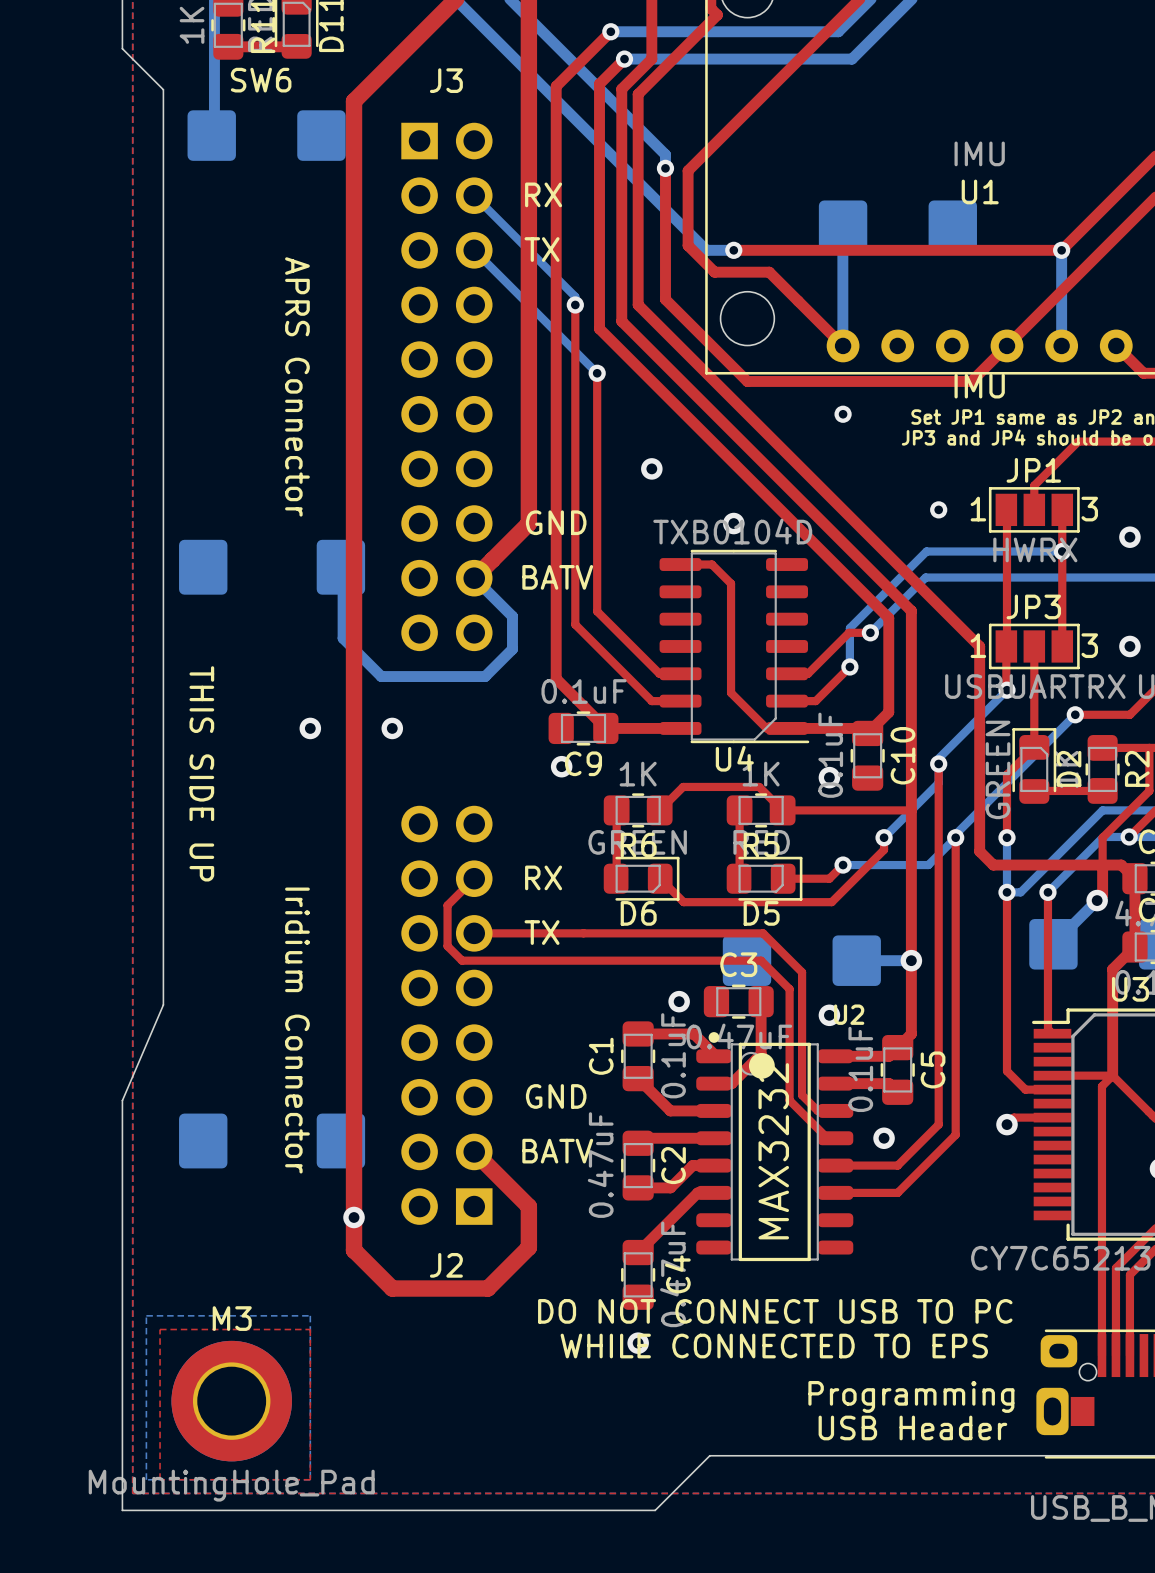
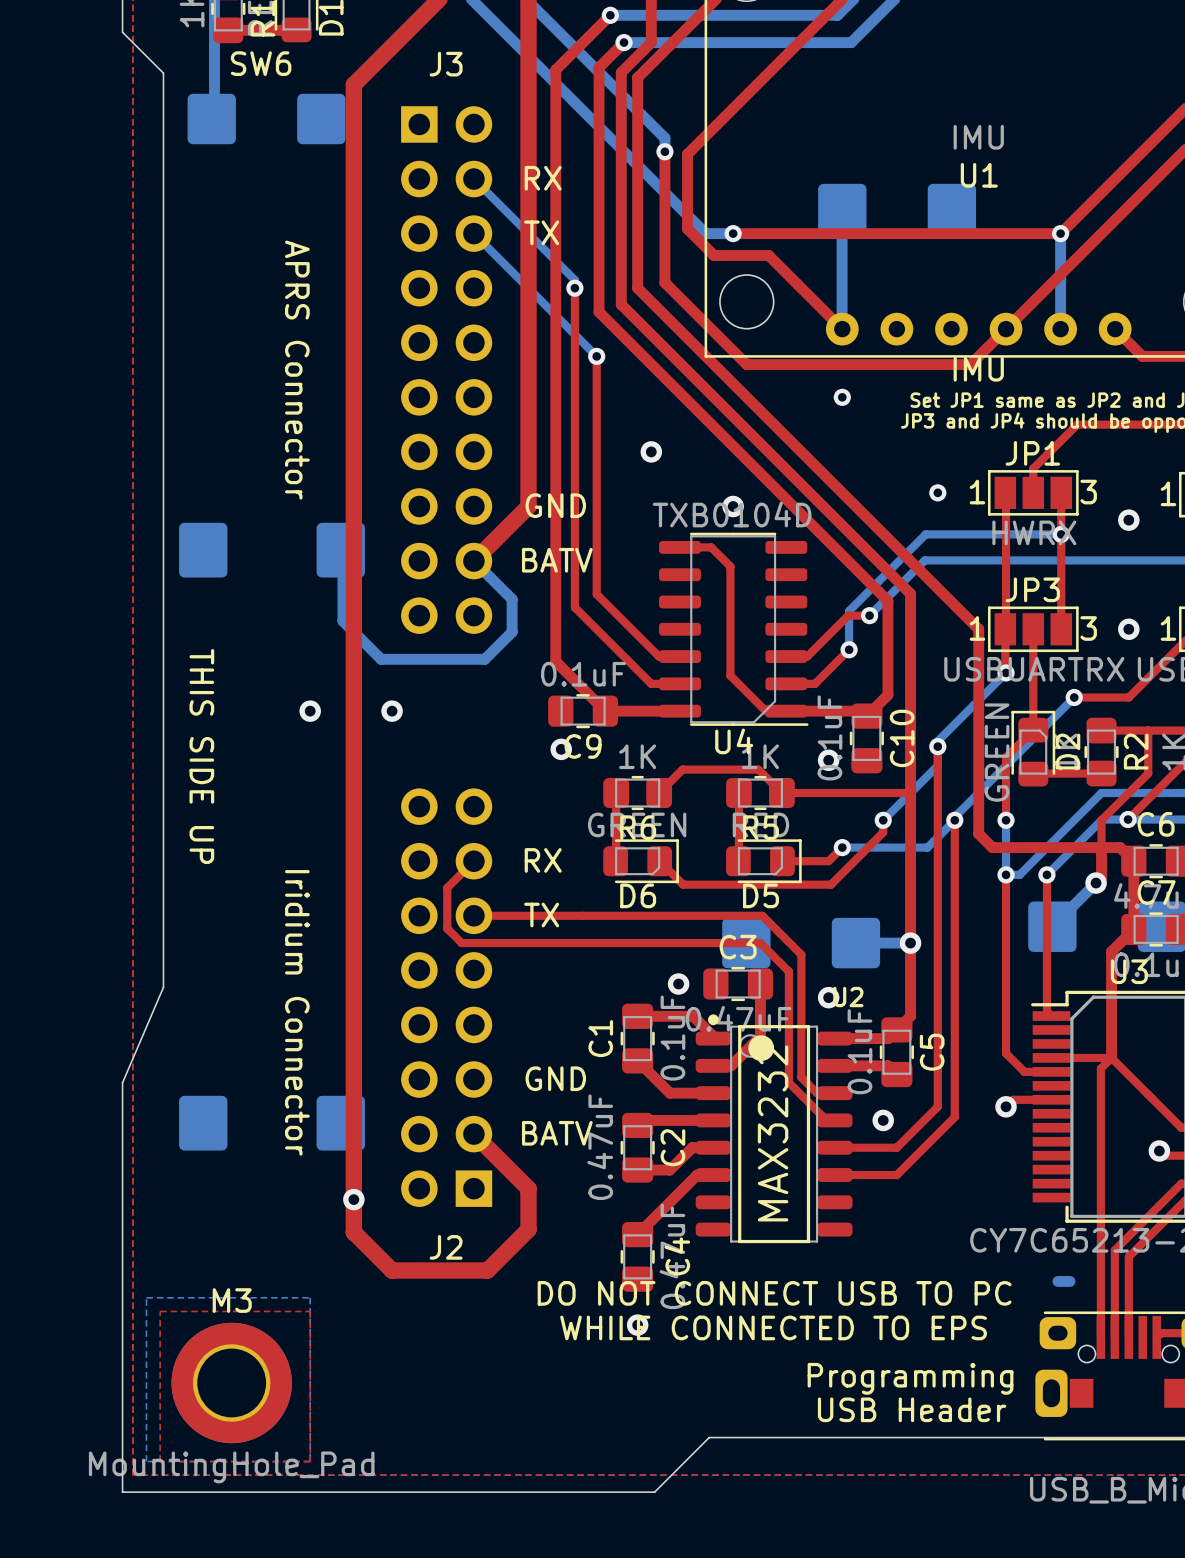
bottom track: none -> (1057, 1281) (1070, 1281)

